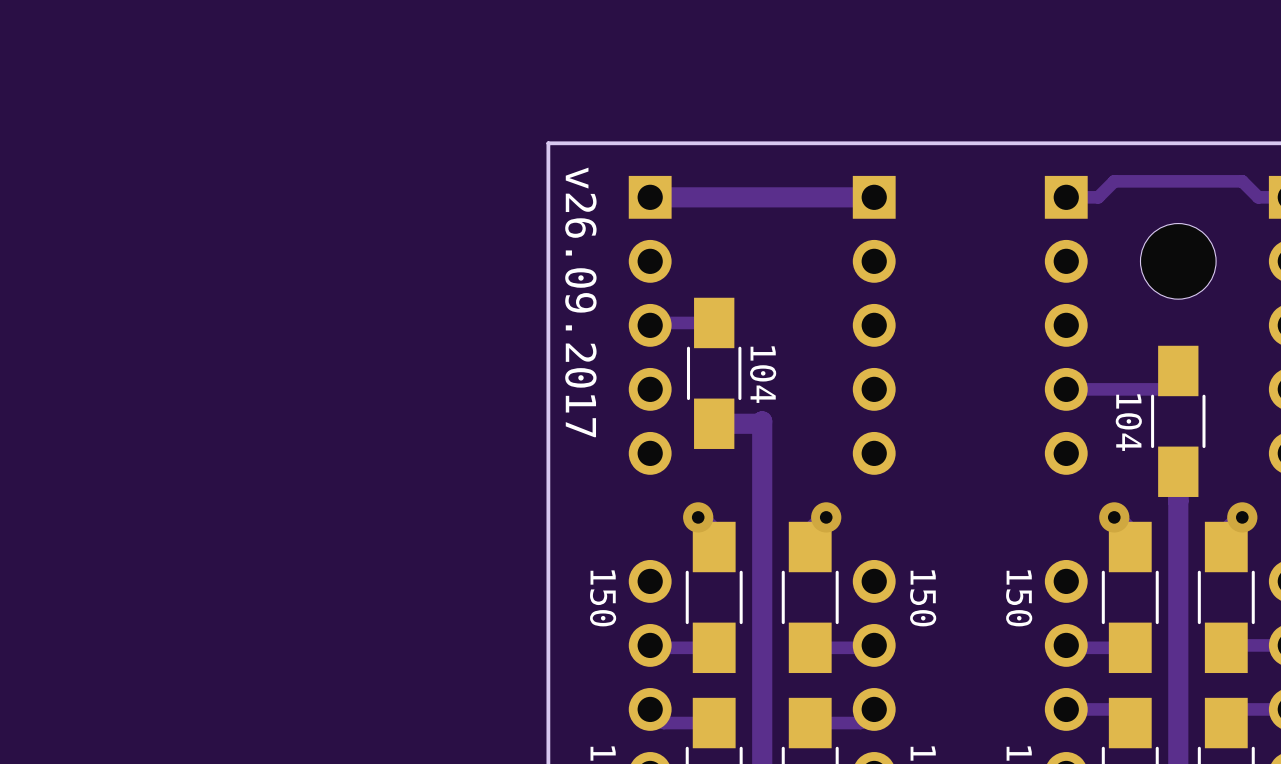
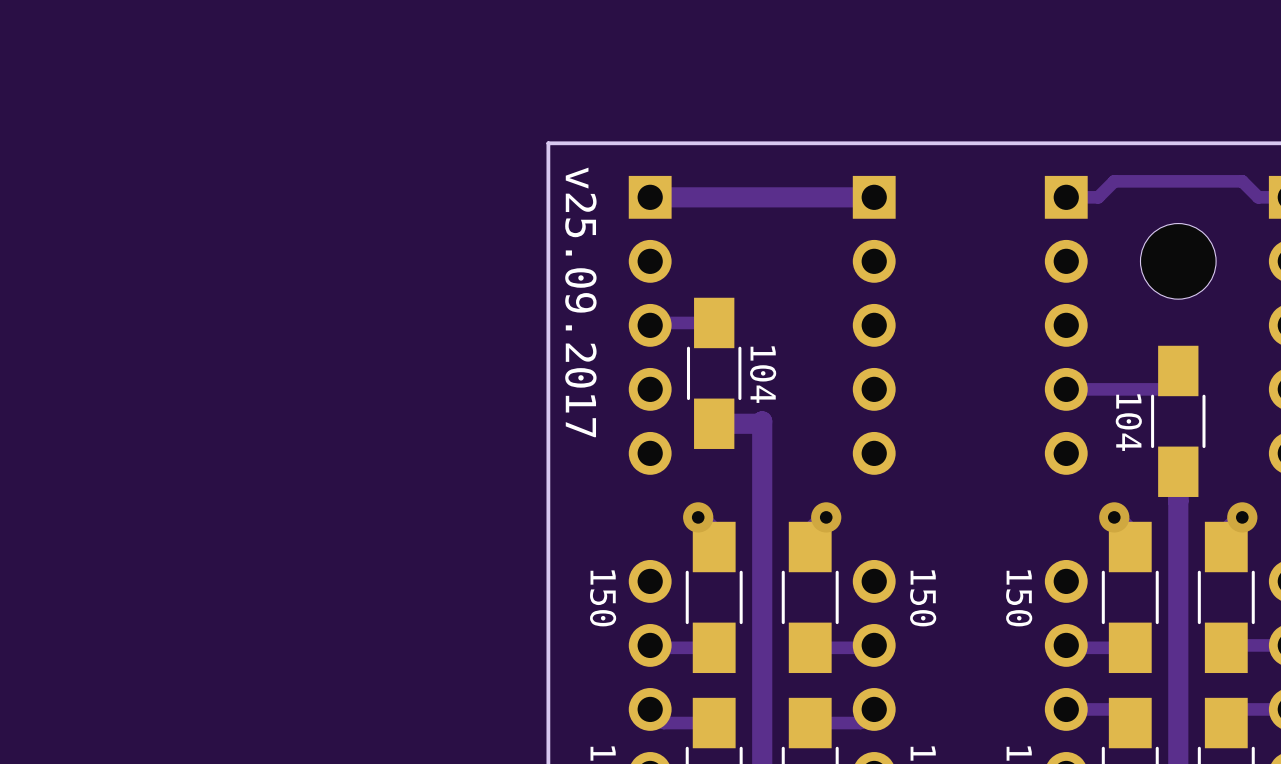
text: v26.09.2017 (580, 302) -> v25.09.2017 (580, 302)

